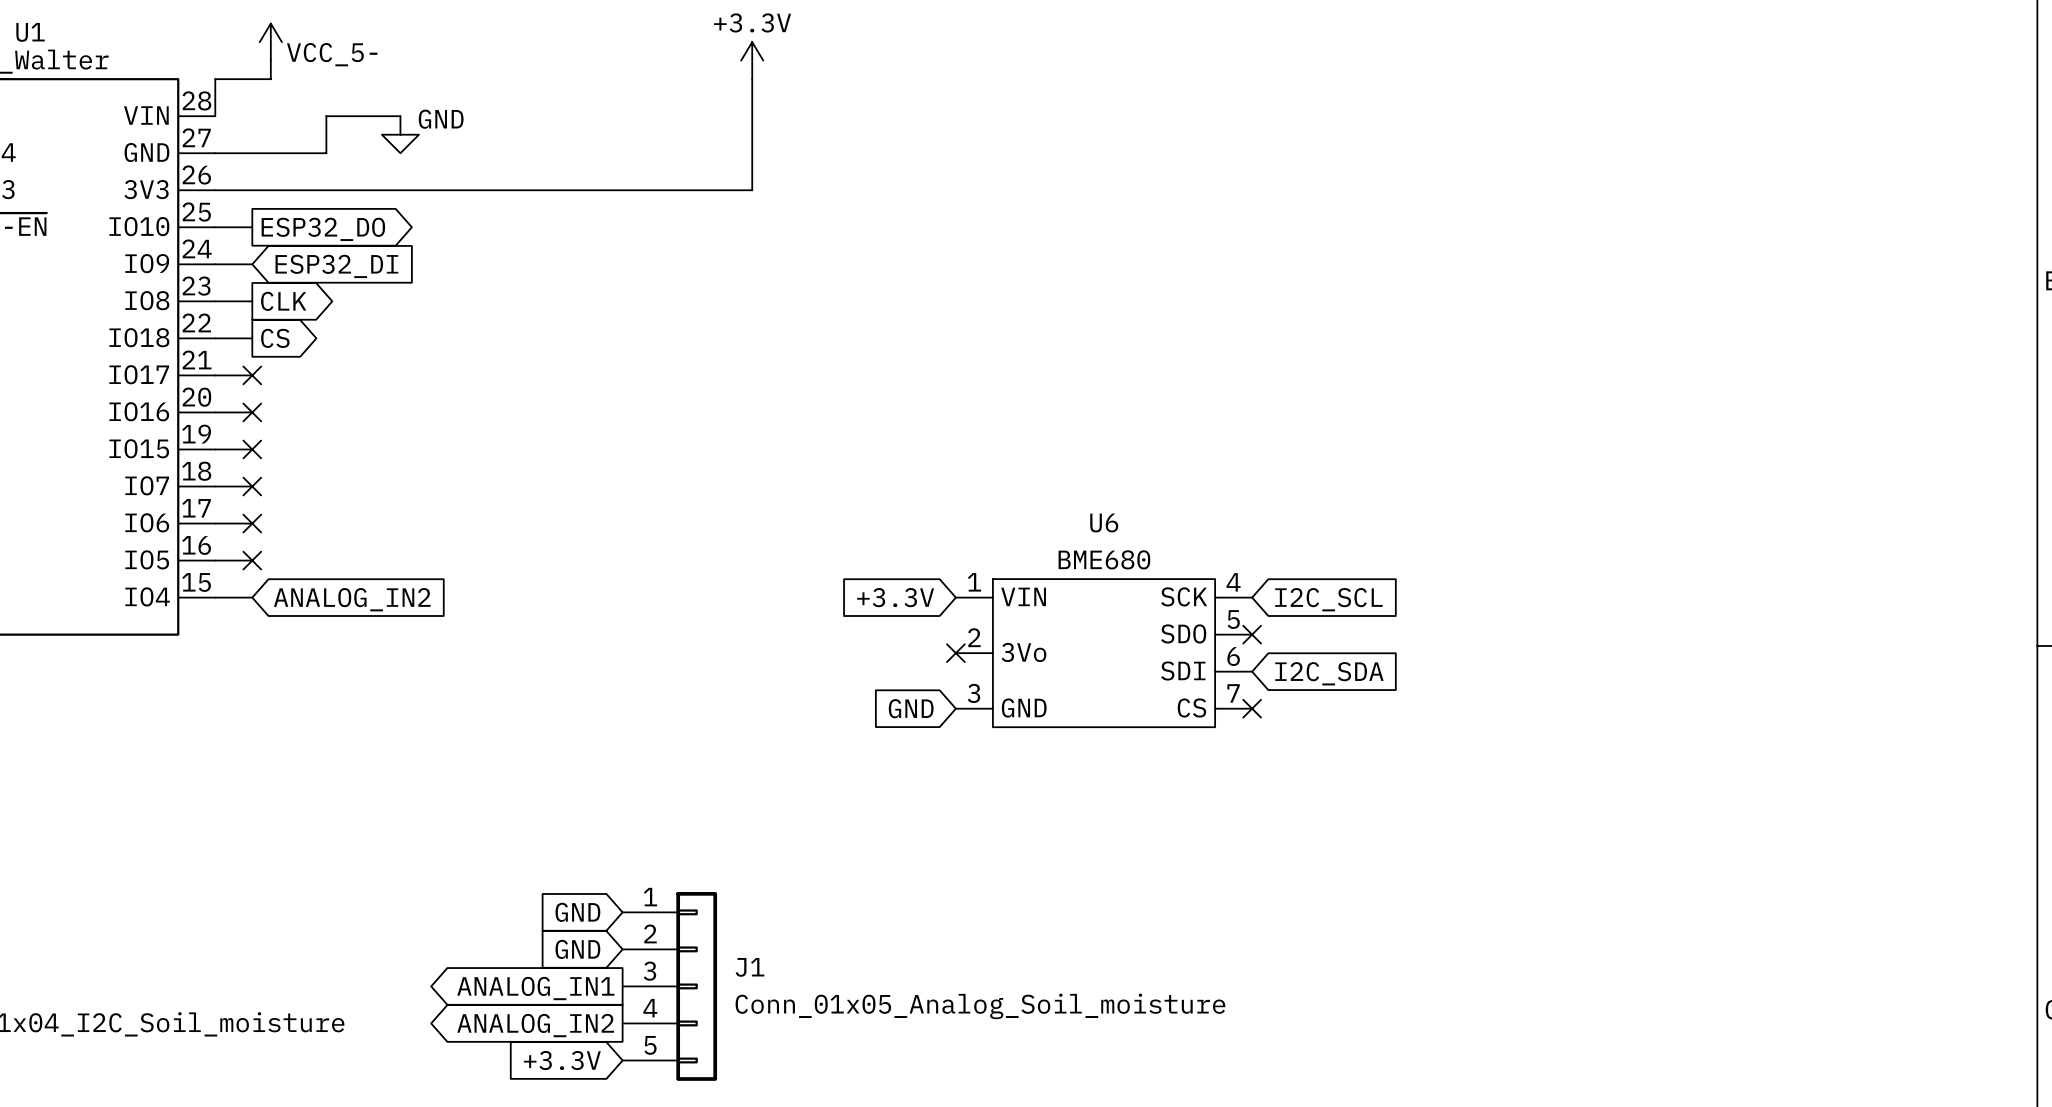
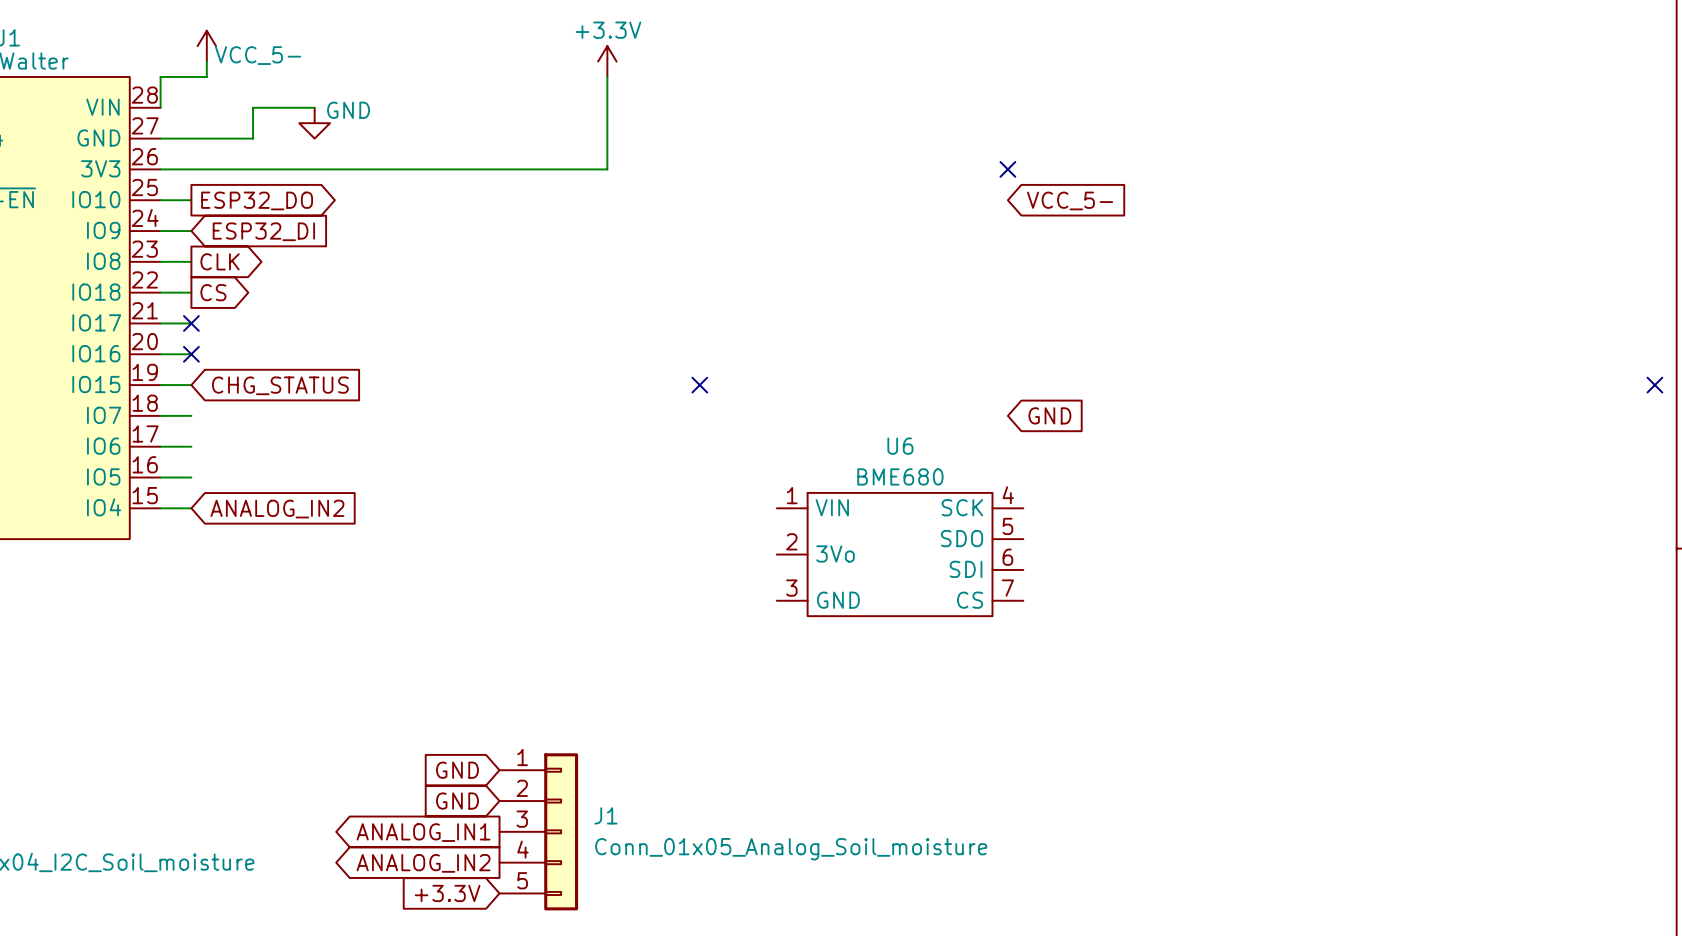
no-connect mark: none -> (1007, 169)
global label: none -> VCC_5- (1070, 200)
no-connect mark: (252, 449) -> none
no-connect mark: none -> (699, 385)
no-connect mark: none -> (1654, 385)
global label: none -> CHG_STATUS (280, 385)
no-connect mark: (252, 486) -> none
no-connect mark: (252, 523) -> none
no-connect mark: (252, 560) -> none
global label: +3.3V (895, 597) -> none
global label: I2C_SCL (1328, 599) -> none
no-connect mark: (1252, 634) -> none
no-connect mark: (955, 653) -> none
global label: I2C_SDA (1329, 673) -> none
global label rotation: 0° (911, 708) -> 180° (1049, 415)
global label position: GND (911, 708) -> GND (1049, 415)
no-connect mark: (1252, 708) -> none

